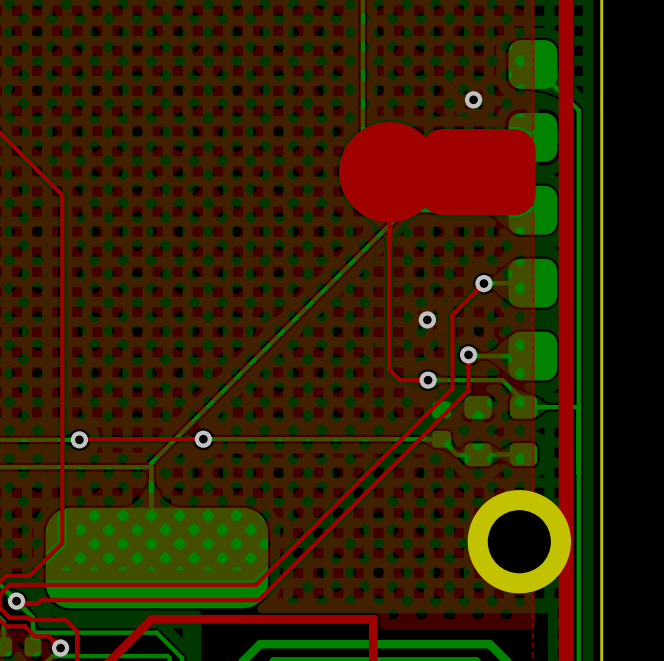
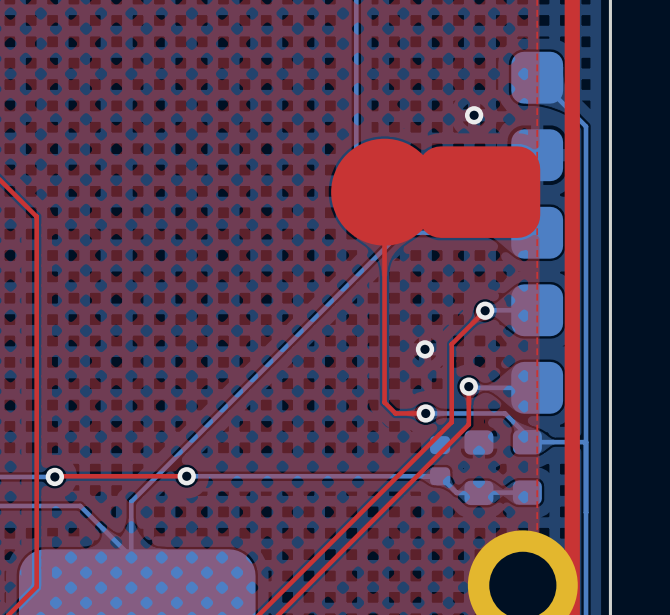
bottom track: (103, 467) (151, 467) -> (80, 505) (176, 602)

